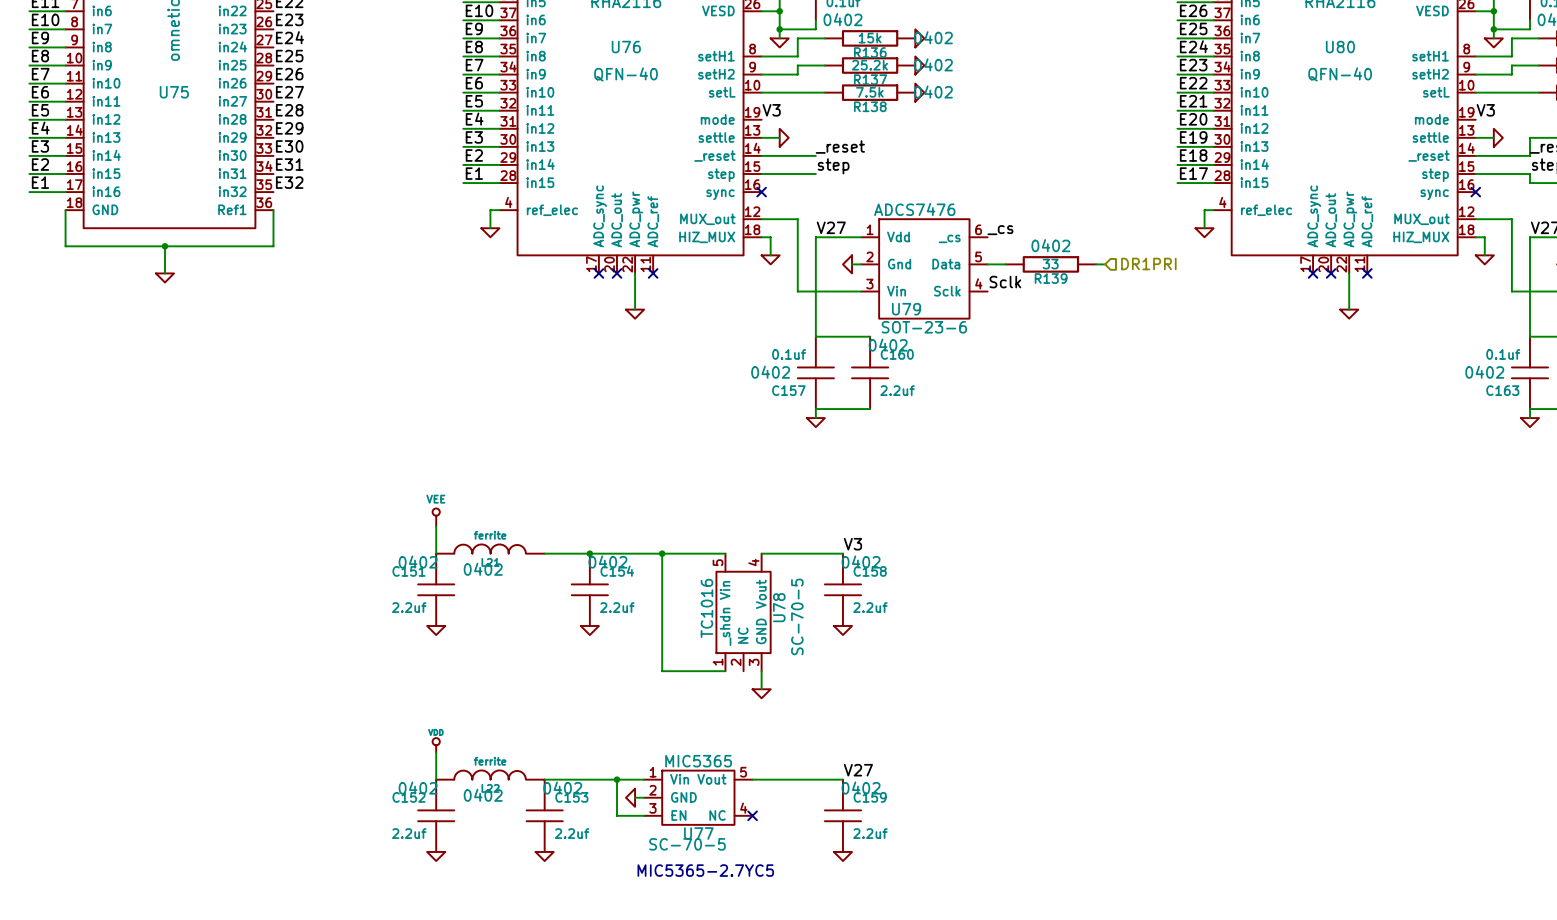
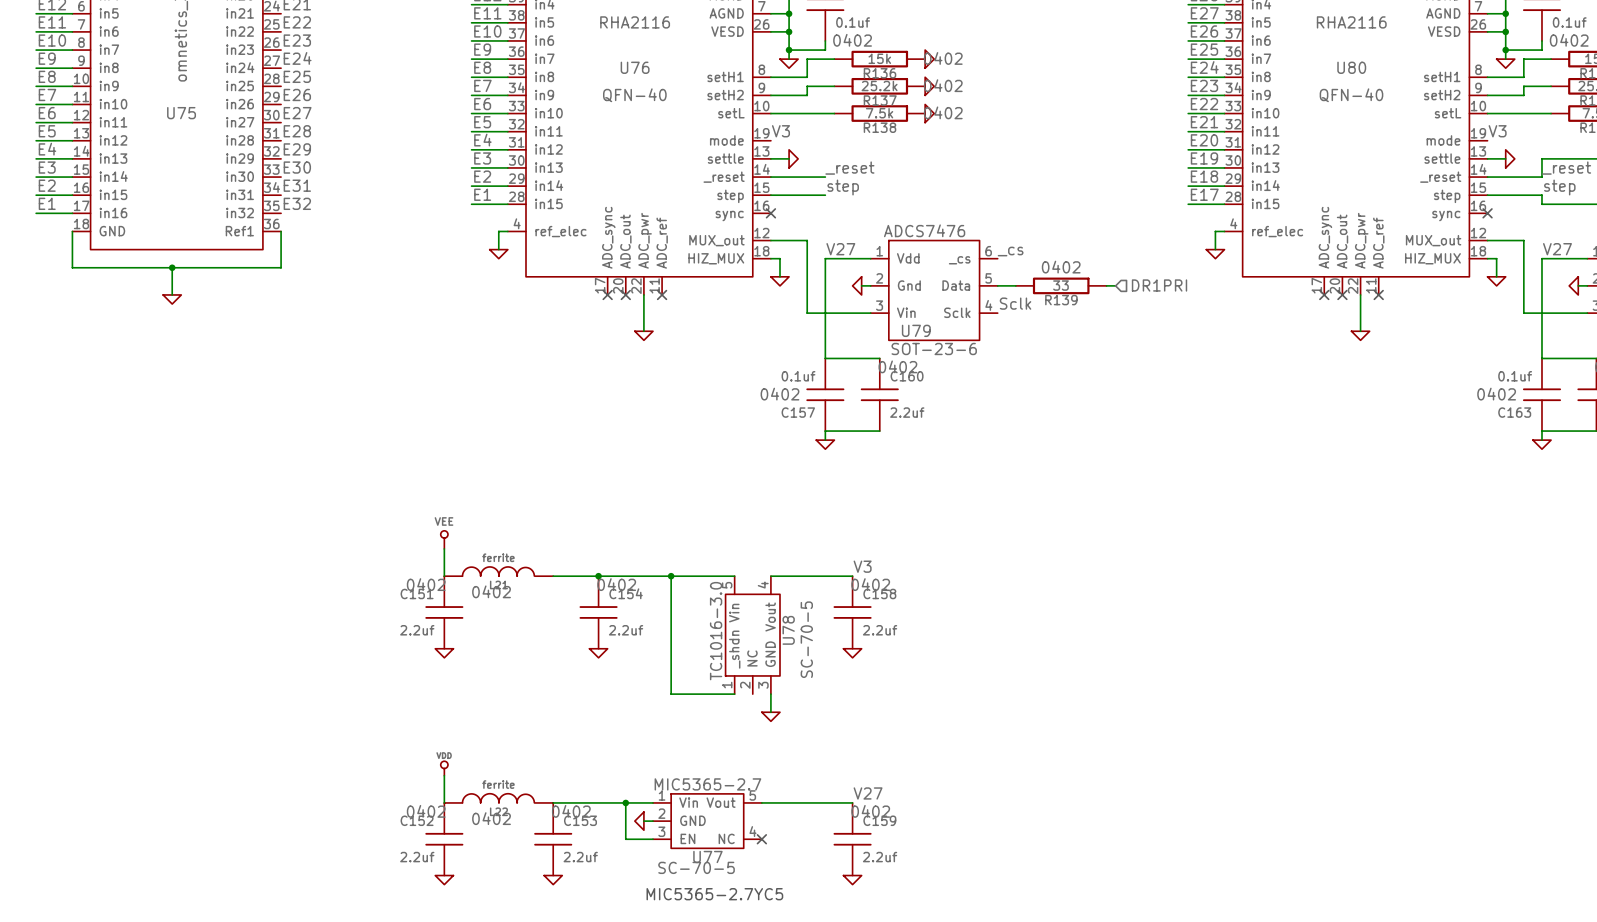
U78 value: TC1016 (706, 608) -> TC1016-3.0 (716, 631)
U77 value: MIC5365 (698, 761) -> MIC5365-2.7 (707, 784)

